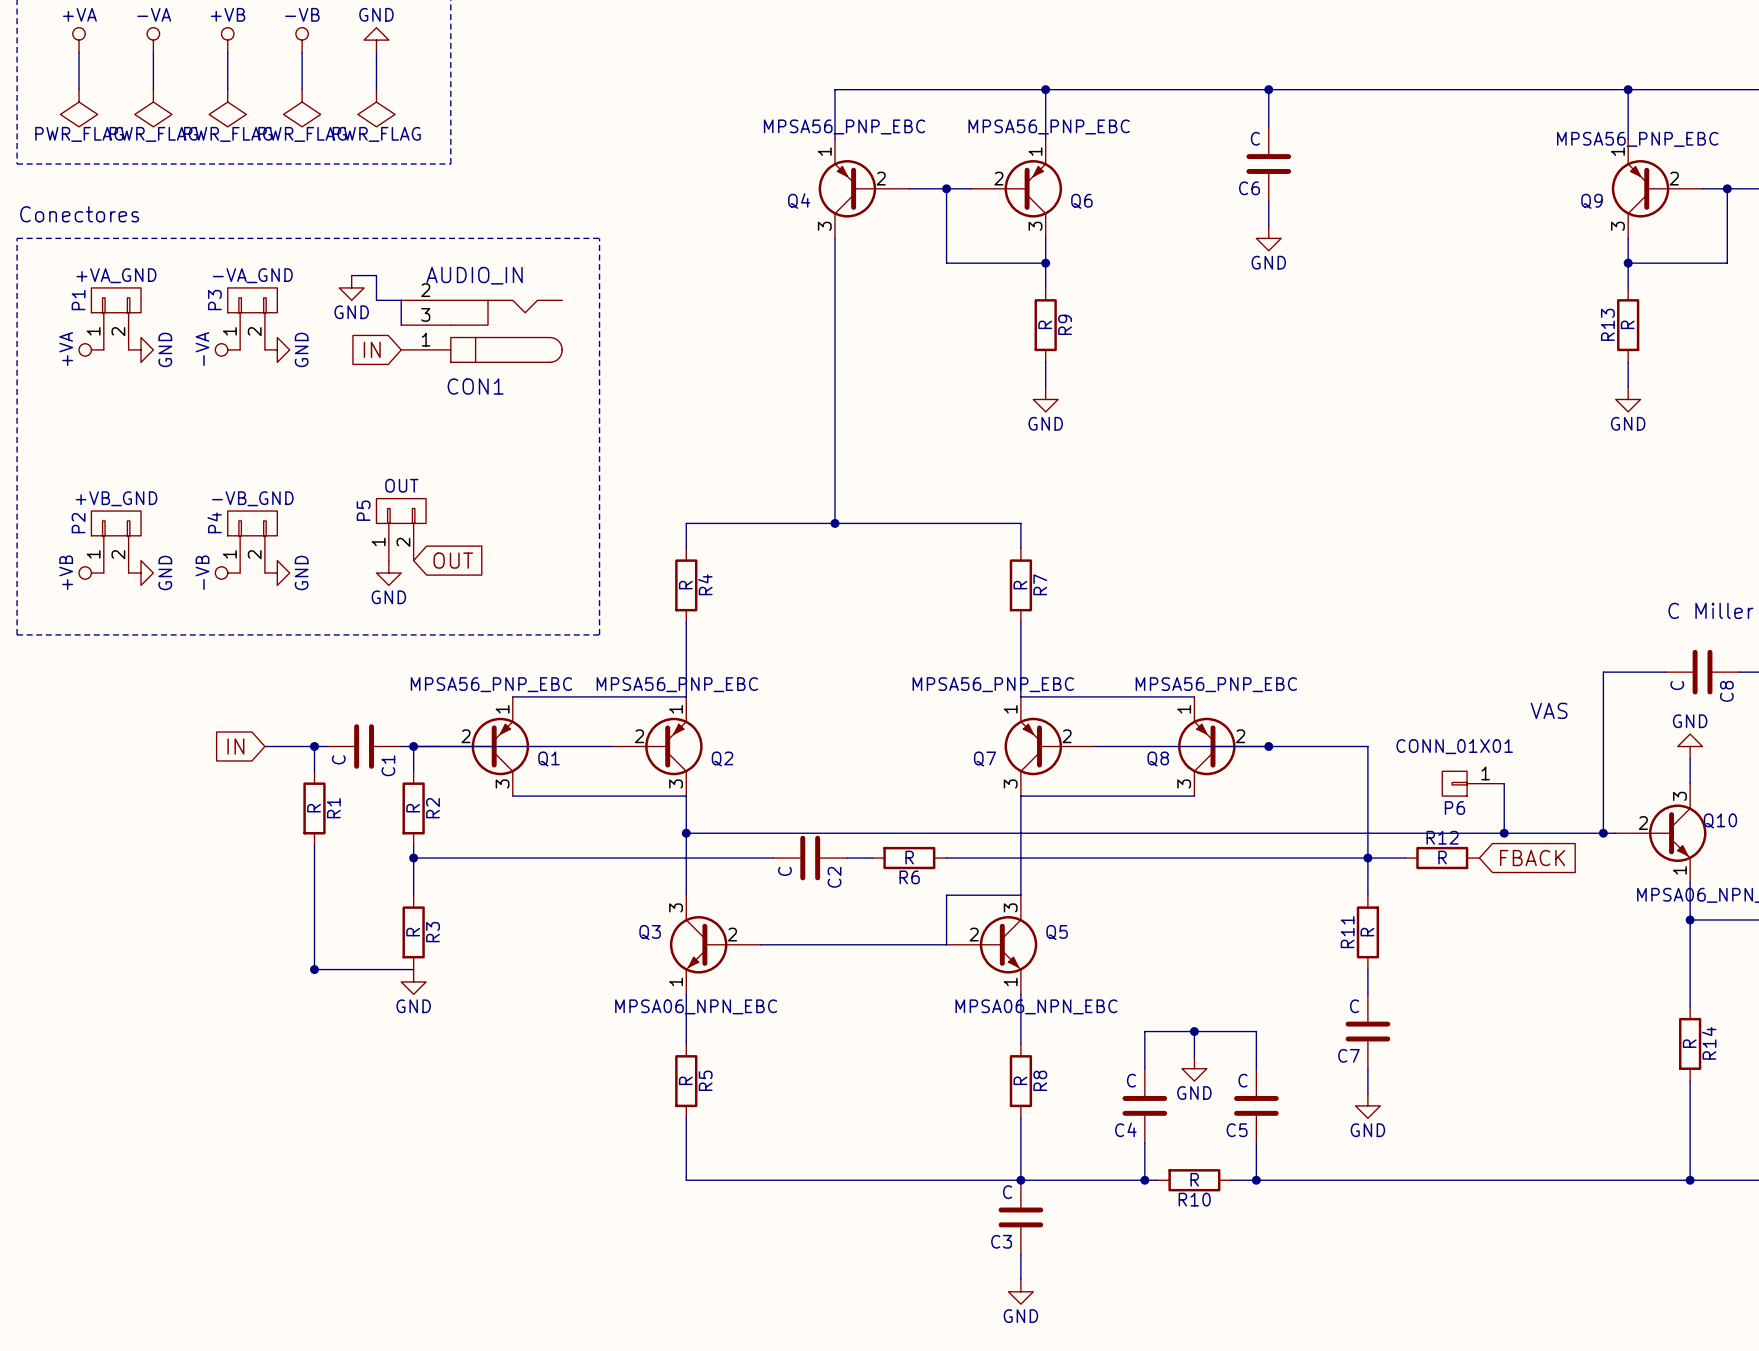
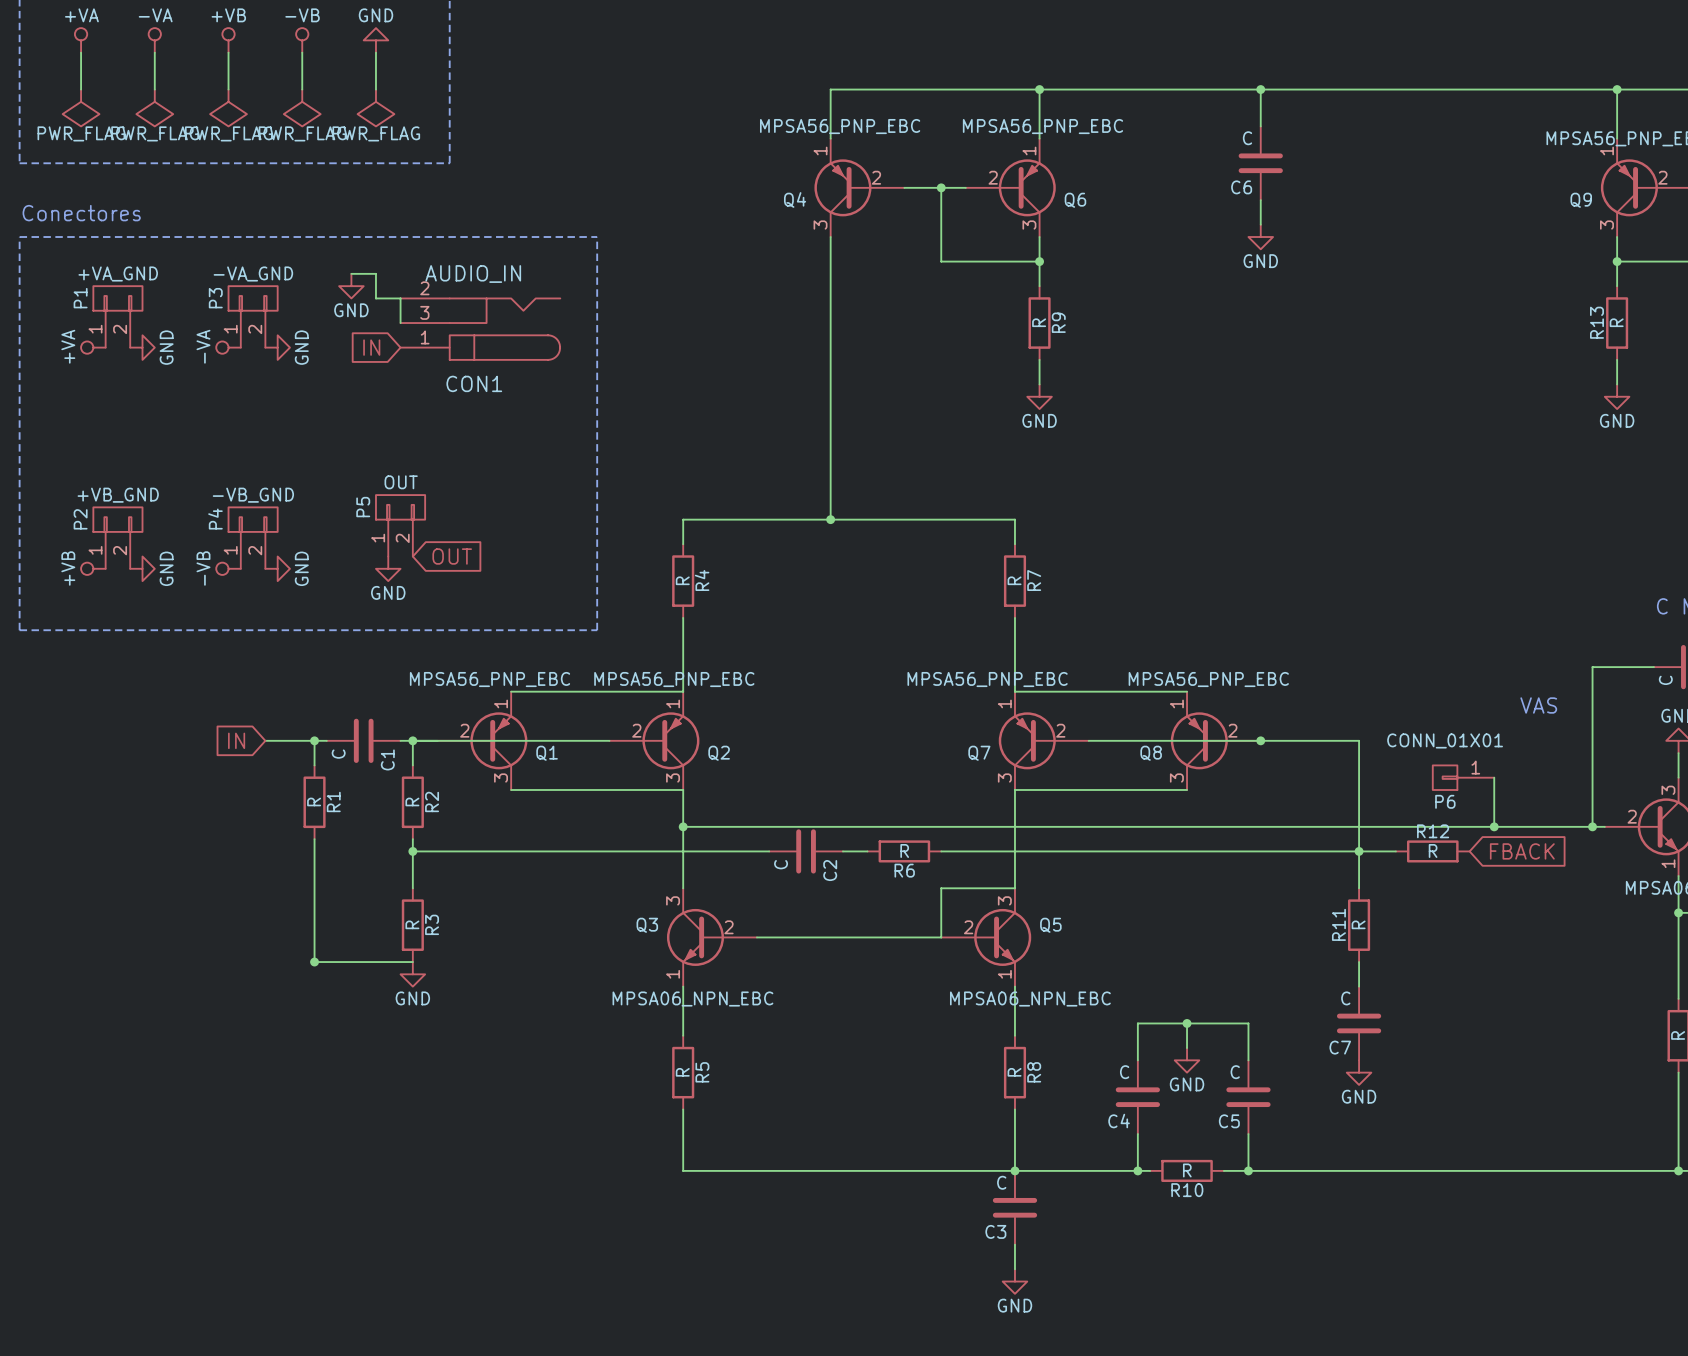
power symbol position: GND (1367, 1105) -> GND (1359, 1072)

